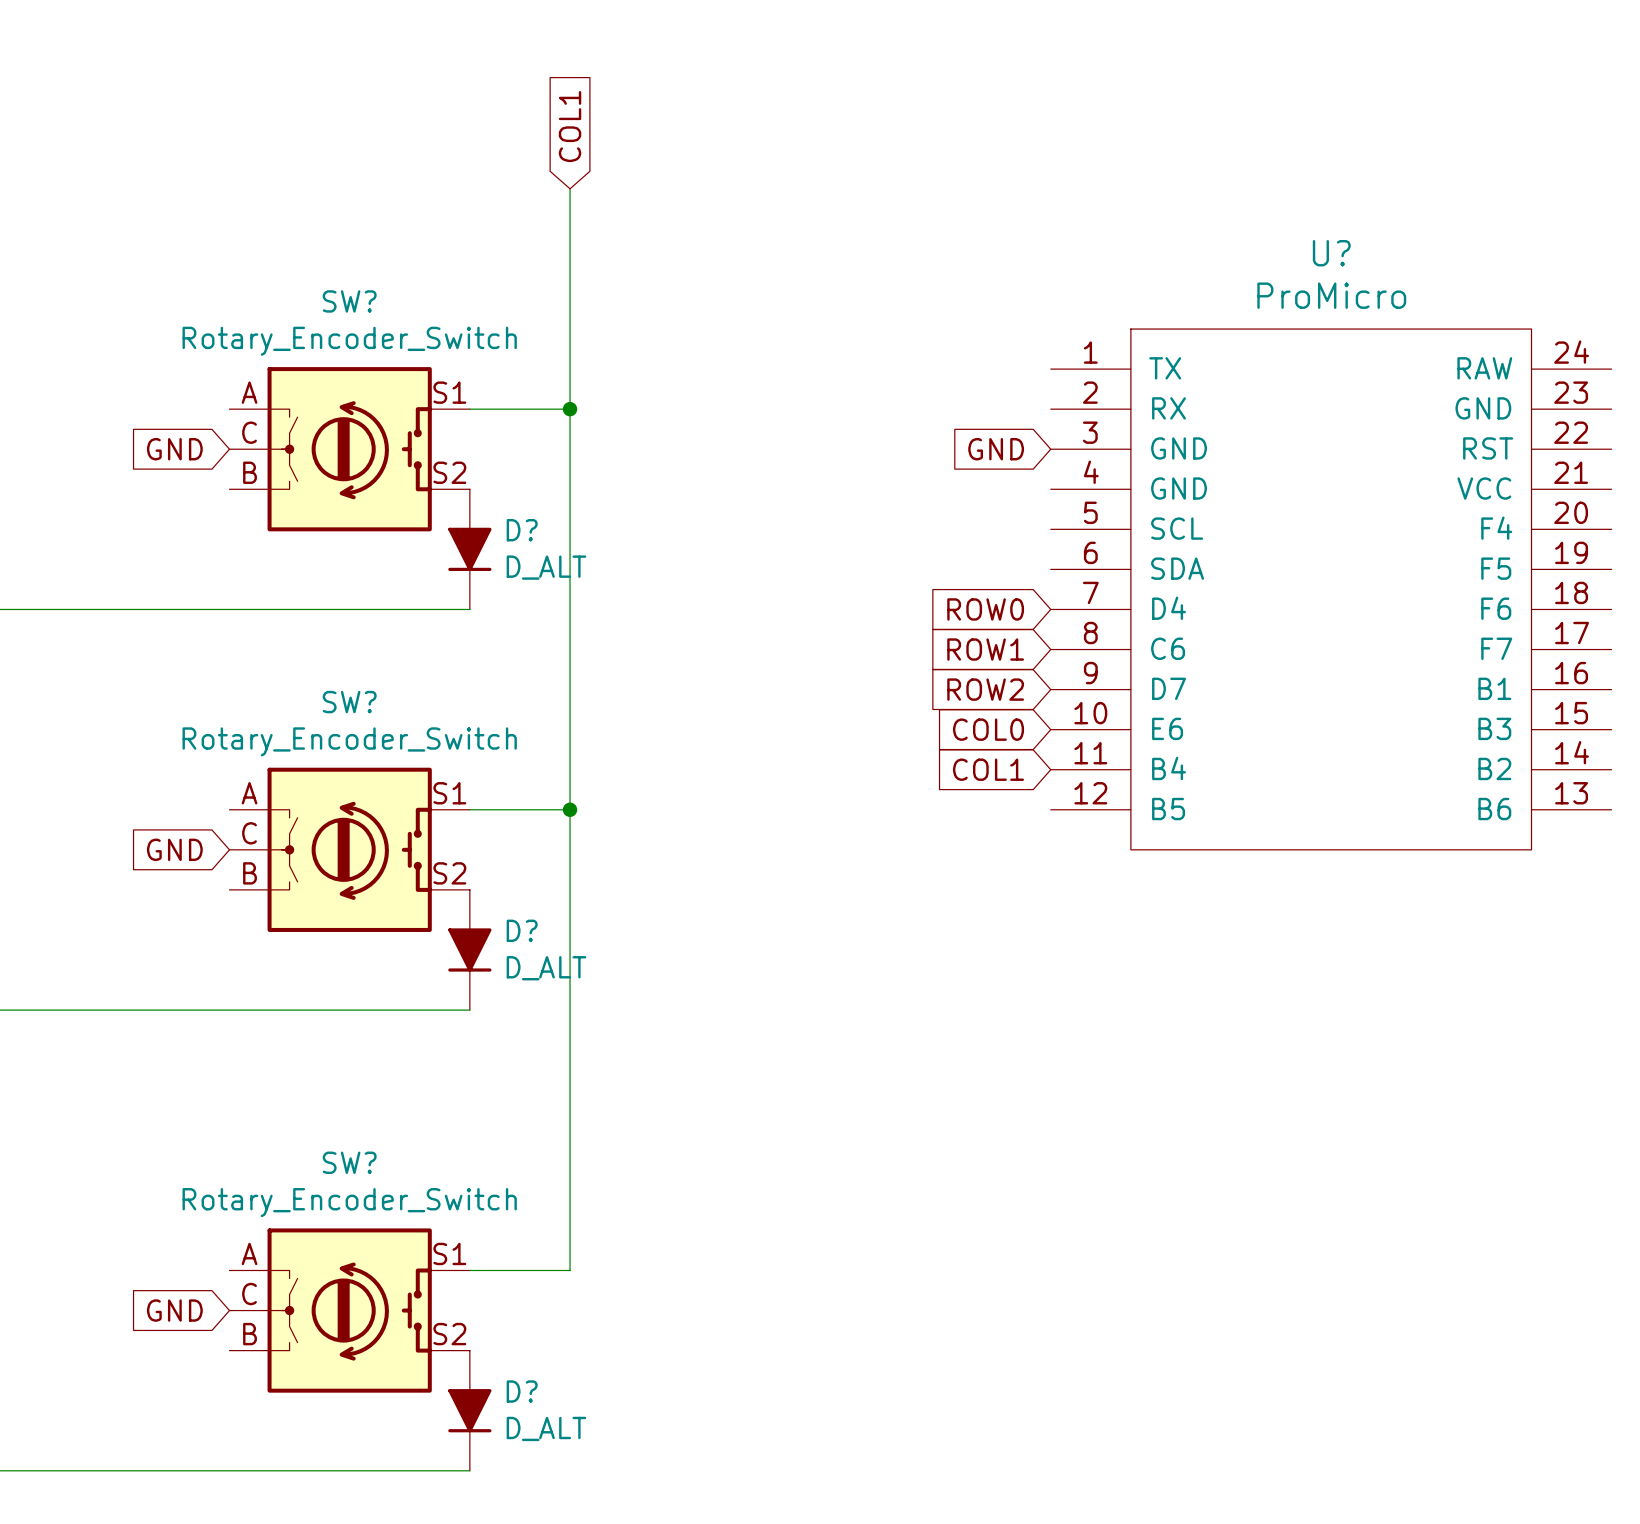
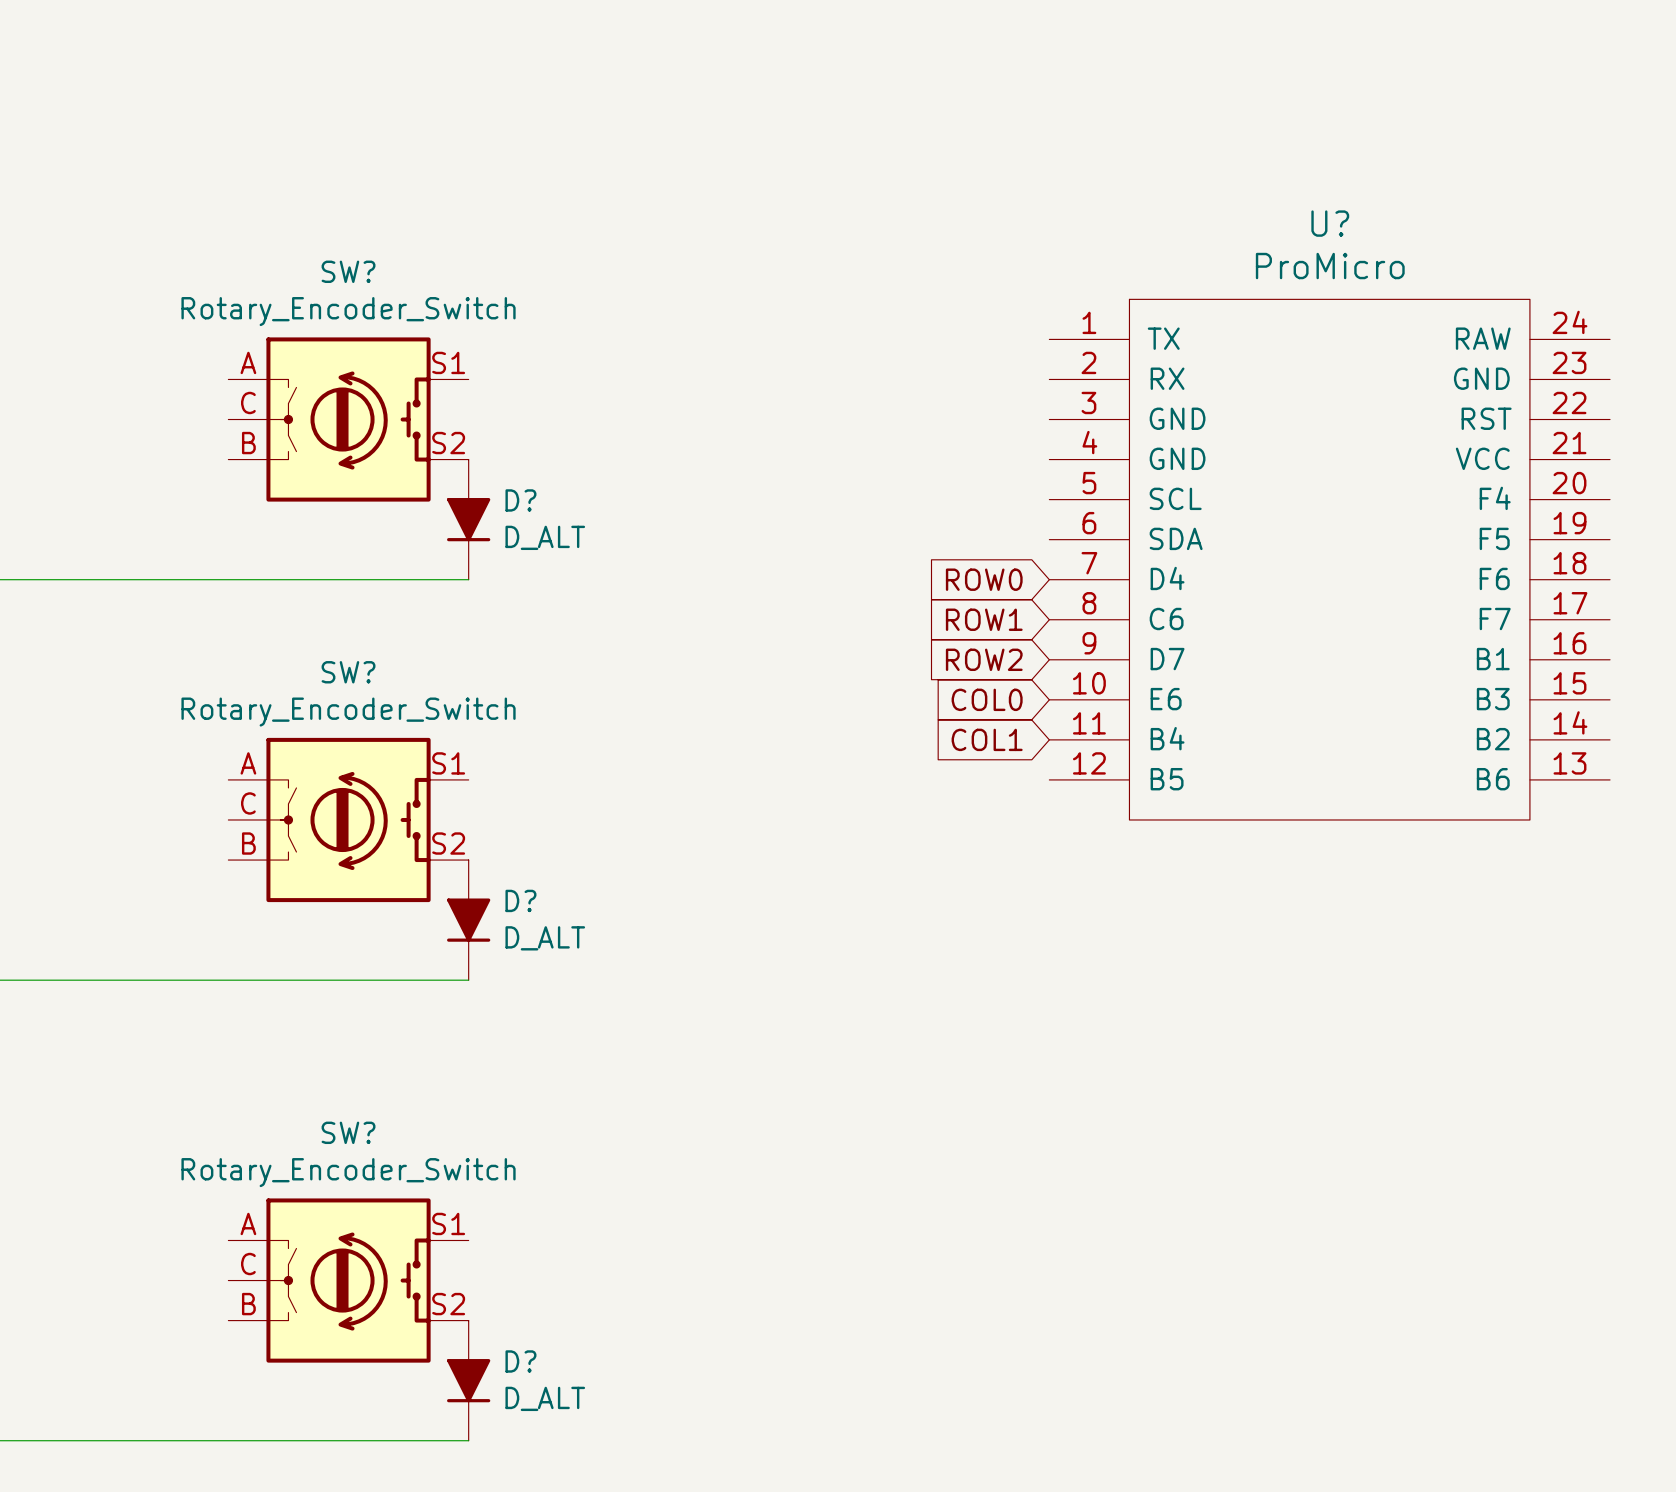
global label: COL1 (570, 126) -> none
wire: (570, 188) (570, 1270) (469, 1270) -> none
wire: (469, 409) (570, 409) -> none
junction: (570, 409) -> none
global label: GND (174, 449) -> none
global label: GND (996, 449) -> none
wire: (469, 809) (570, 809) -> none
junction: (570, 809) -> none
global label: GND (174, 849) -> none
global label: GND (174, 1310) -> none

